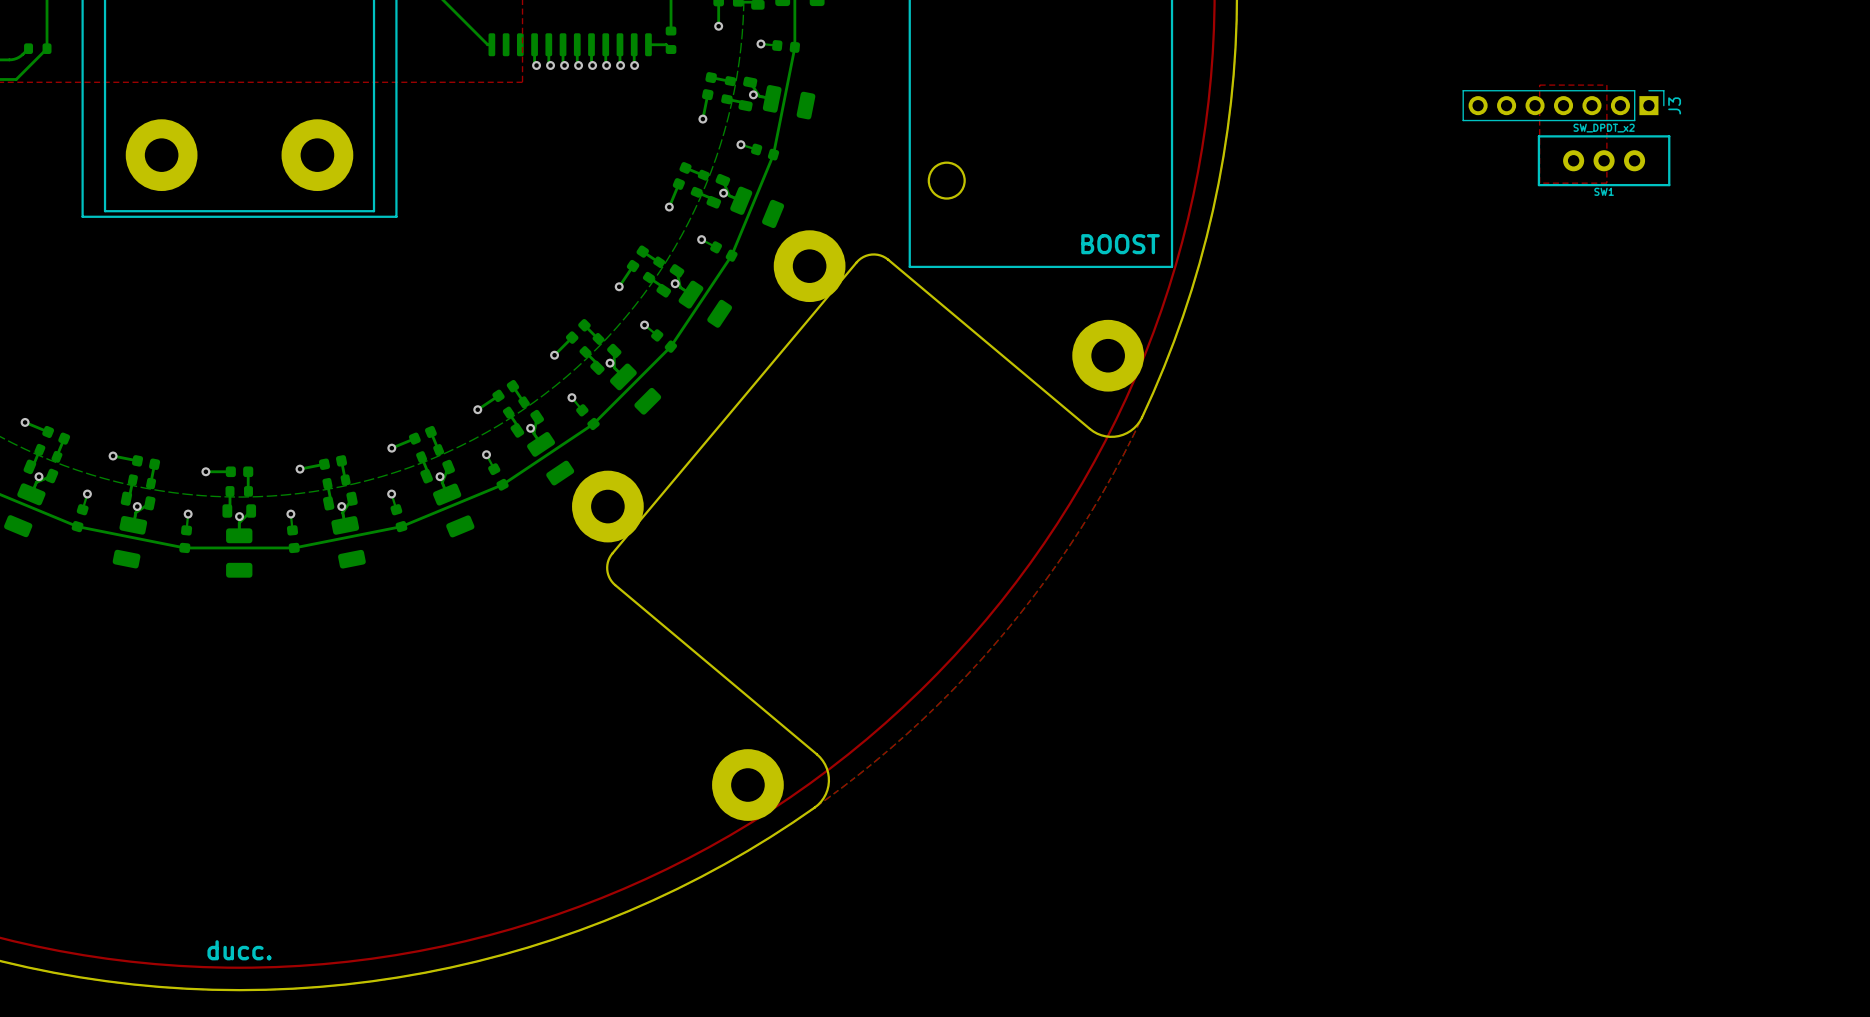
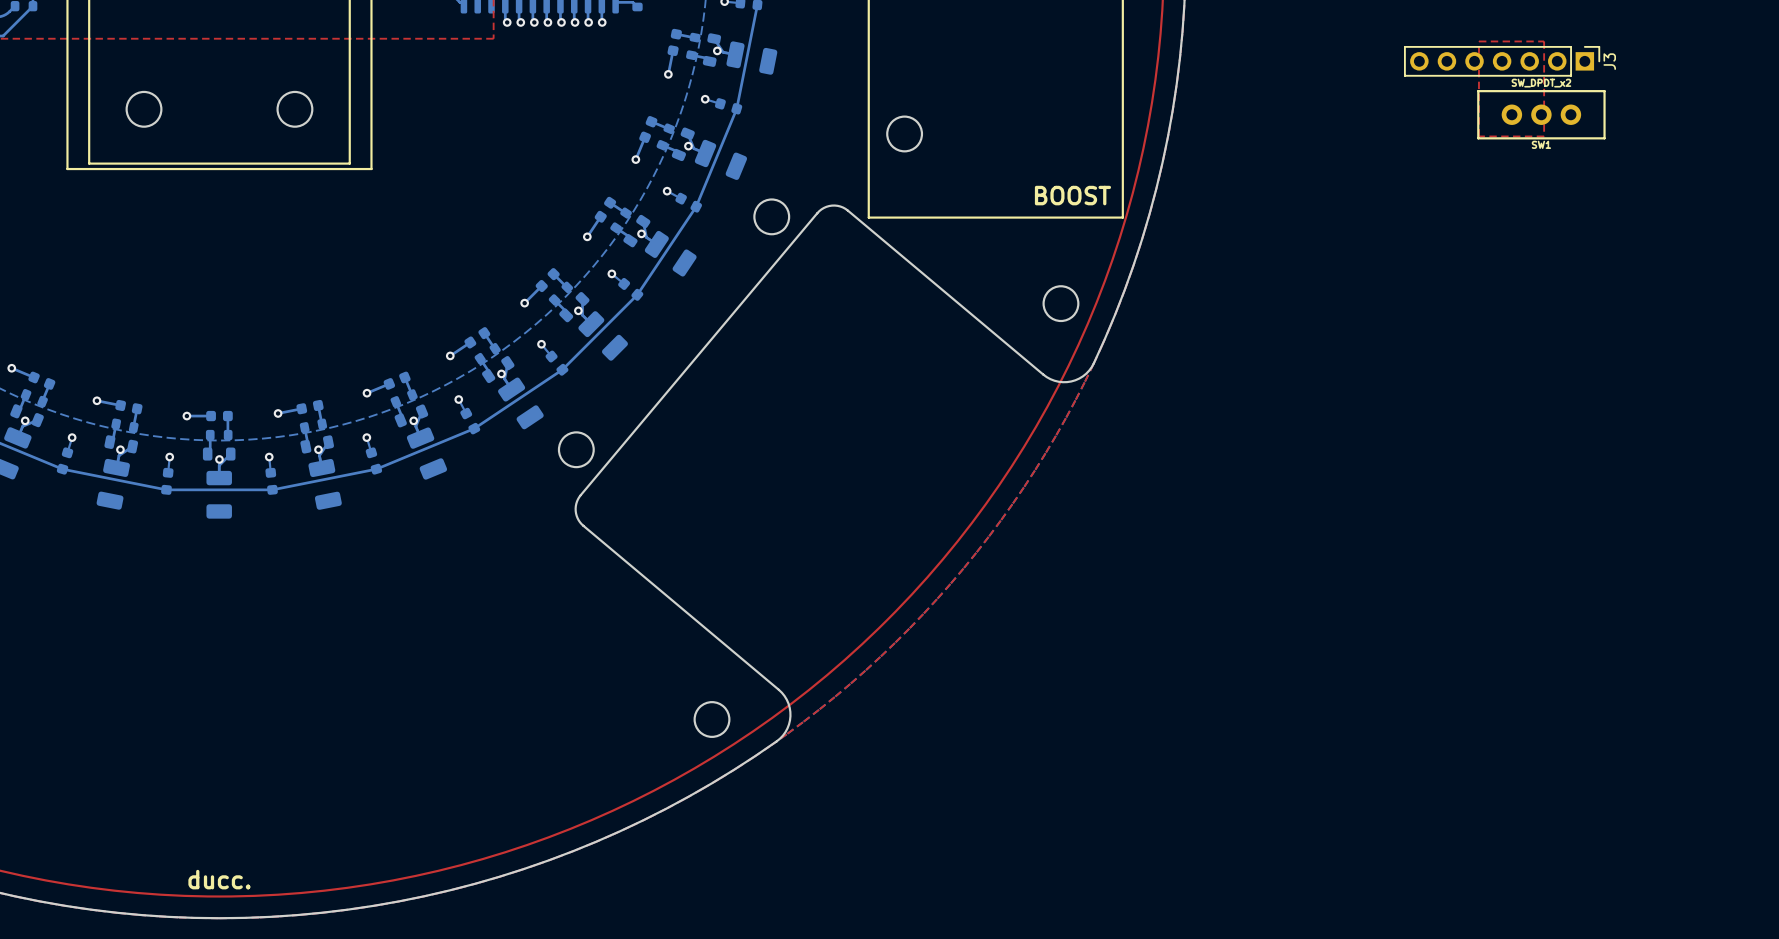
part: (161, 155) -> none
part: (317, 155) -> none
part: (809, 266) -> none
part: (1108, 355) -> none
part: (607, 506) -> none
part: (747, 785) -> none

